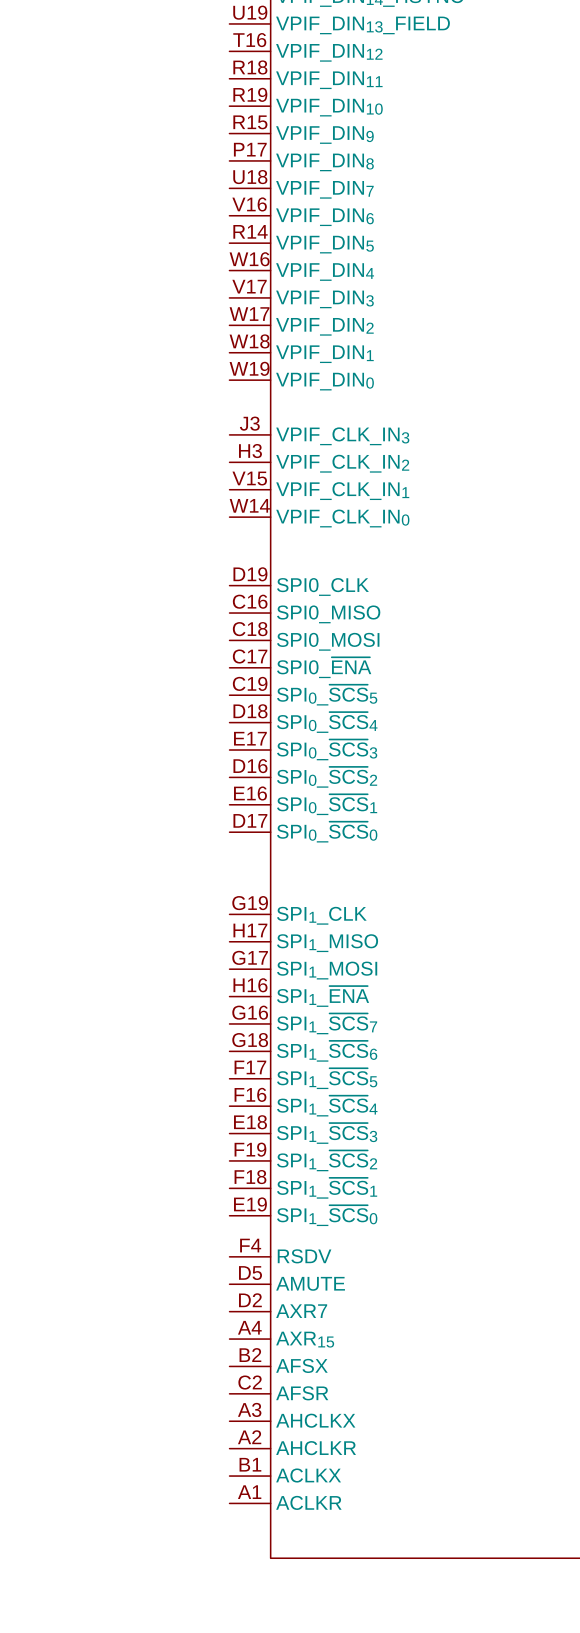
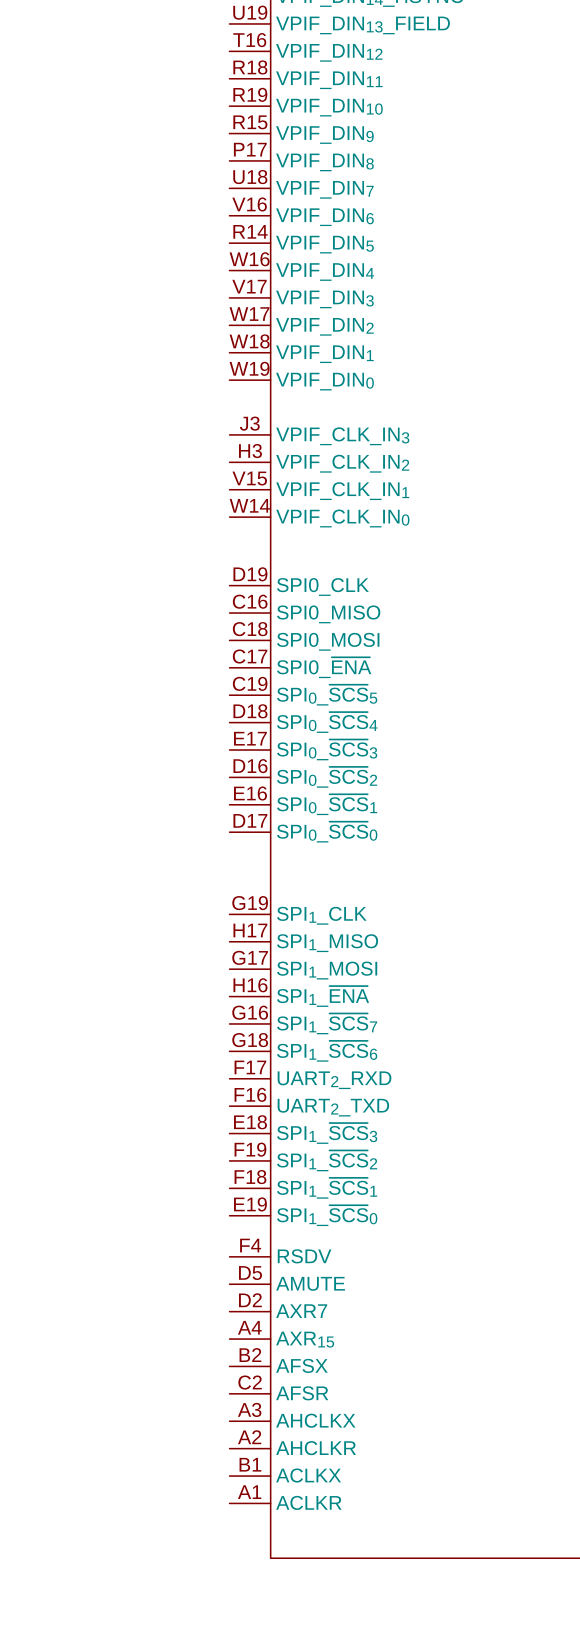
part pin name: SPI1_~{SCS}5 (327, 1078) -> UART2_RXD (334, 1080)
part pin name: SPI1_~{SCS}4 (327, 1106) -> UART2_TXD (333, 1107)

